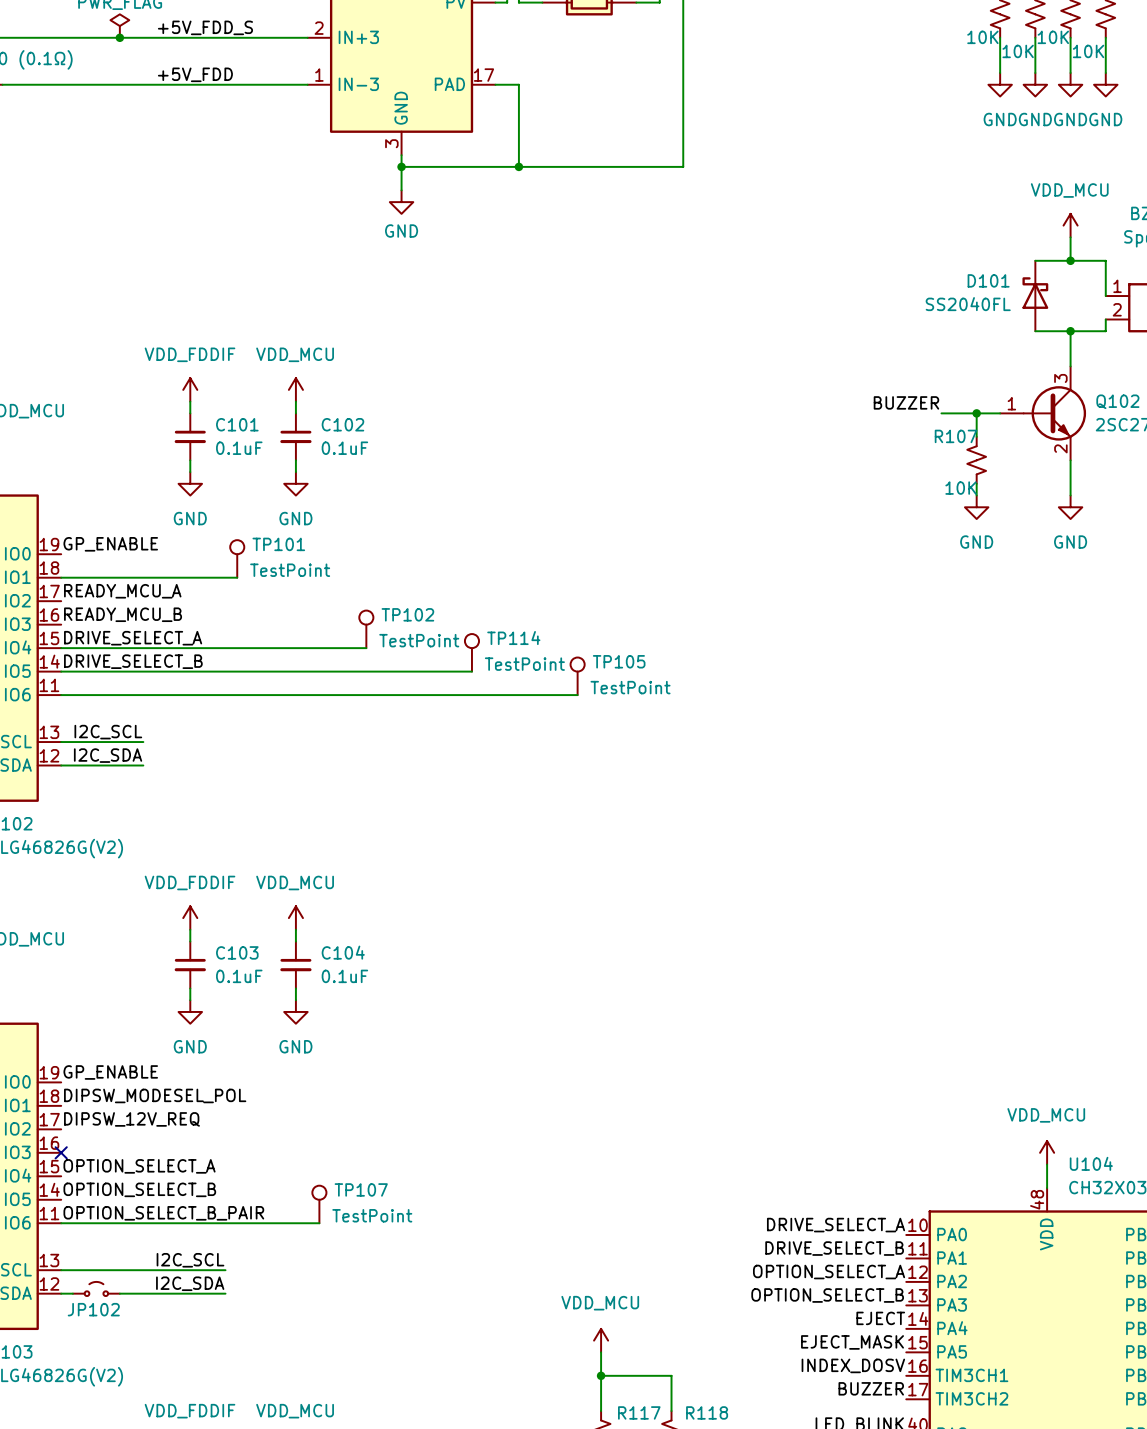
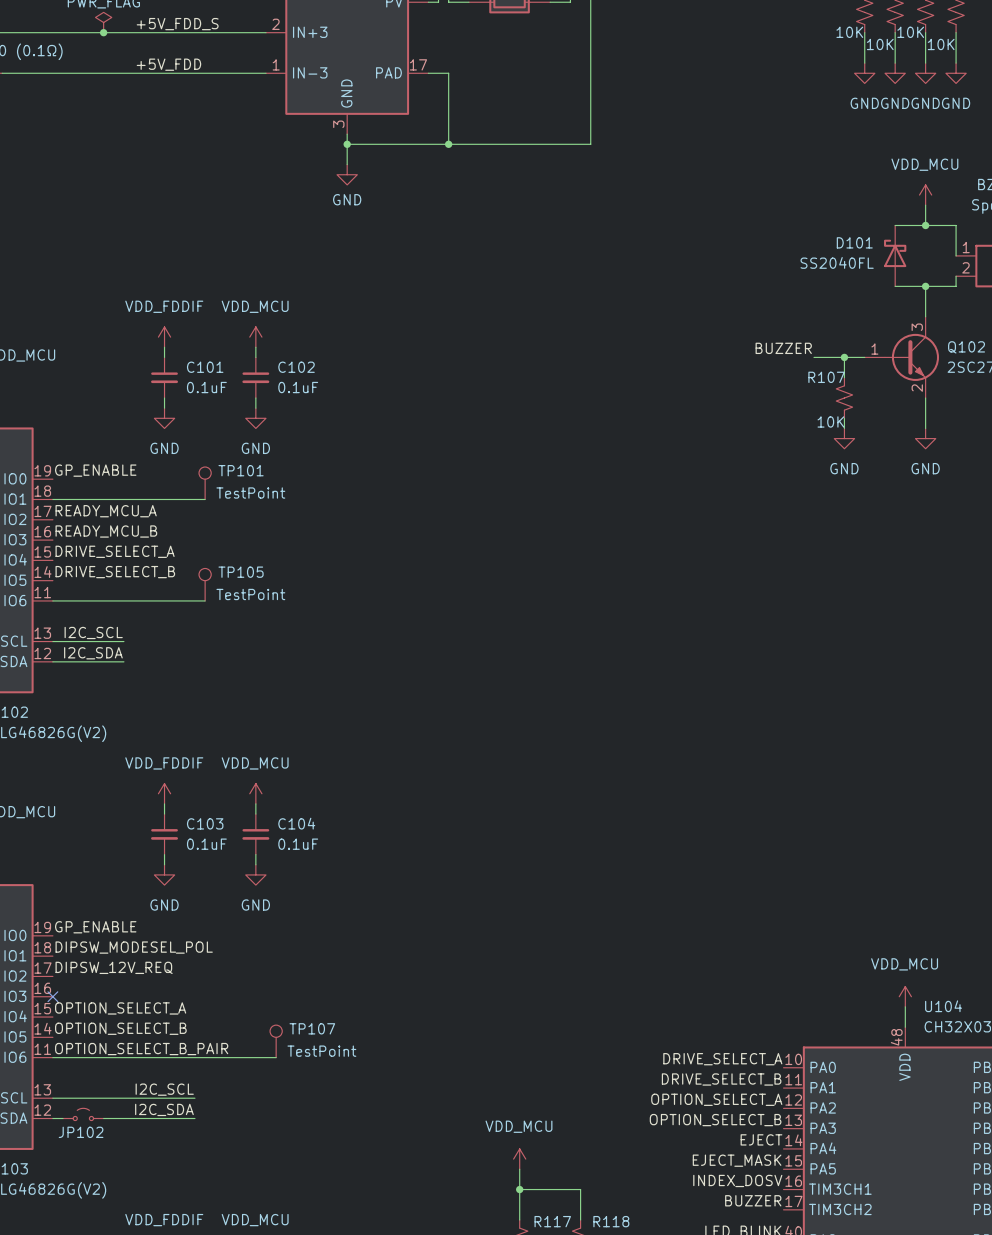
TP102: TestPoint (366, 629) -> none
wire: (61, 648) (366, 648) -> none
TP114: TestPoint (471, 652) -> none
wire: (61, 671) (471, 671) -> none
TP105 position: (577, 676) -> (205, 584)
wire: (237, 695) (577, 695) -> none

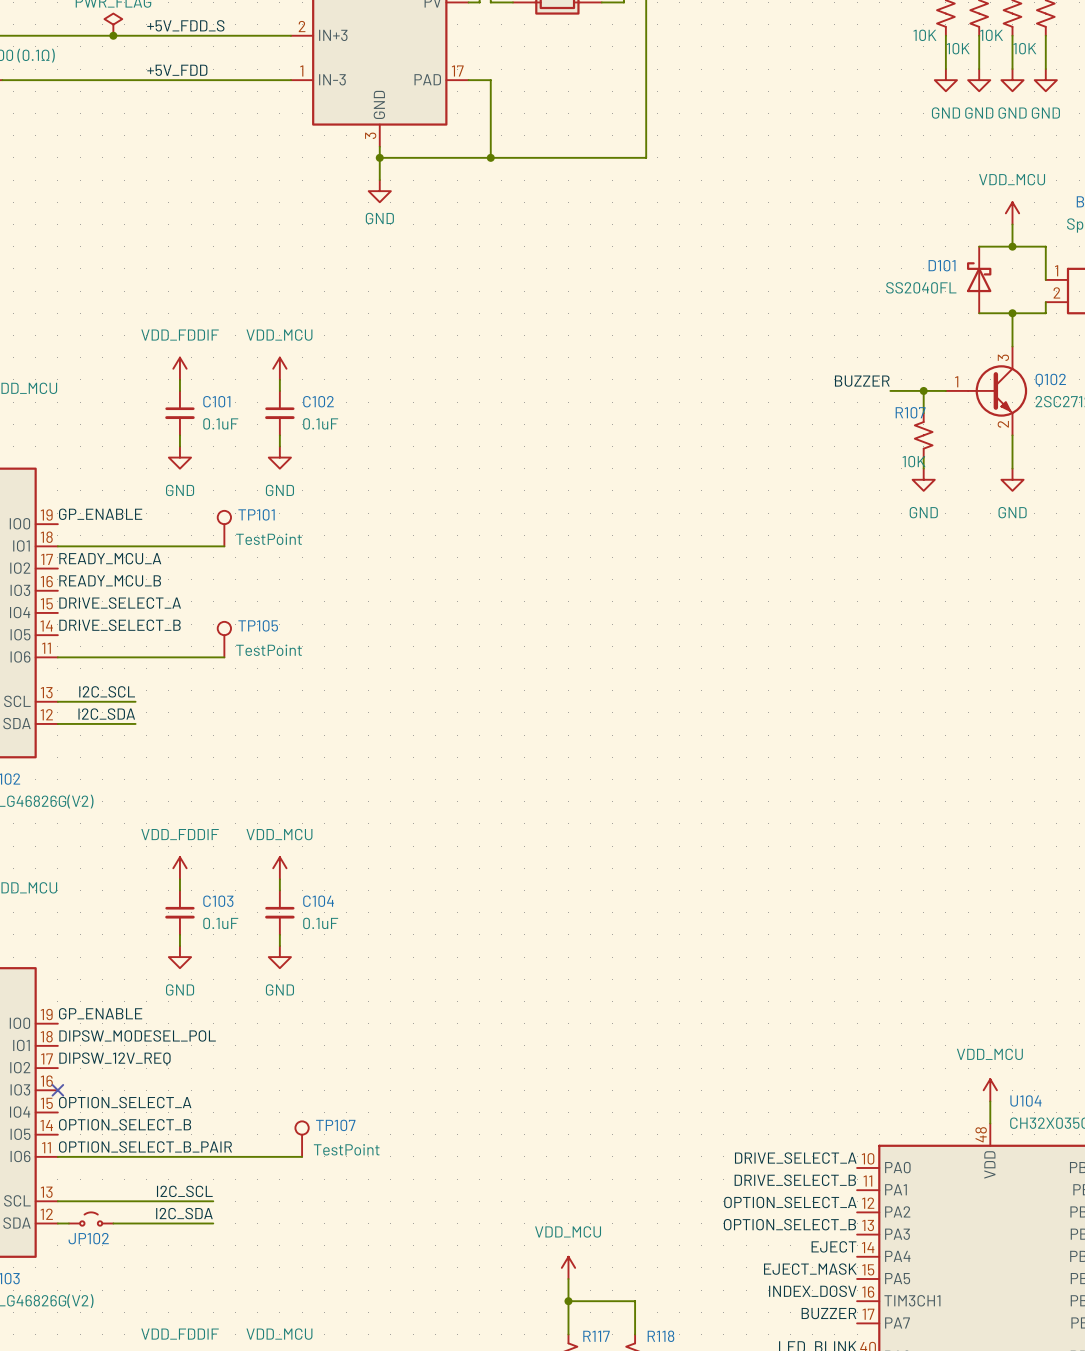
U104 pin name: TIM3CH2 (840, 1209) -> PA7 (897, 1322)

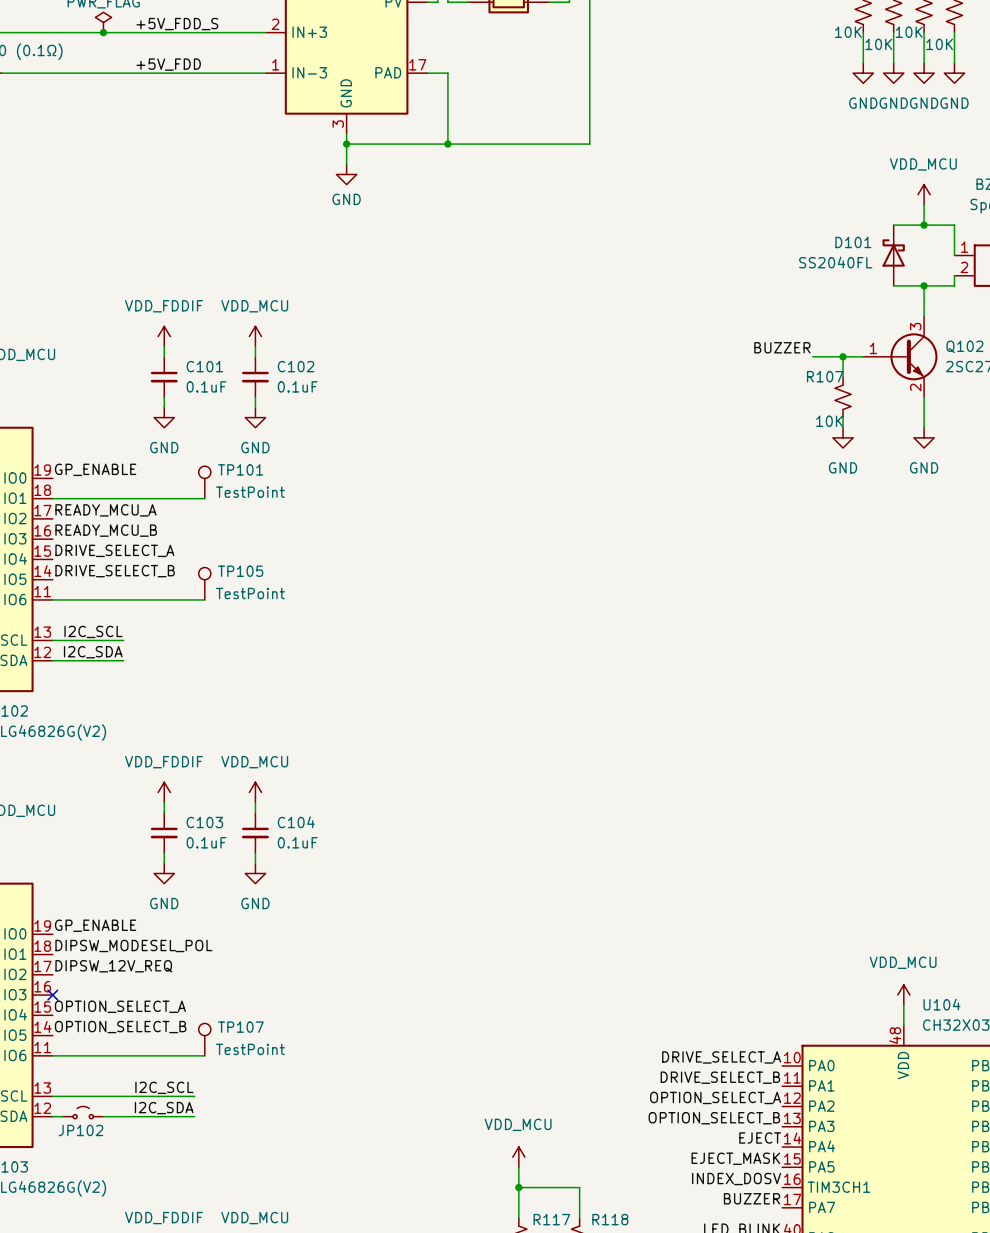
TP107 position: (302, 1139) -> (204, 1039)
label: OPTION_SELECT_B_PAIR (145, 1146) -> none
wire: (224, 1156) (302, 1156) -> none

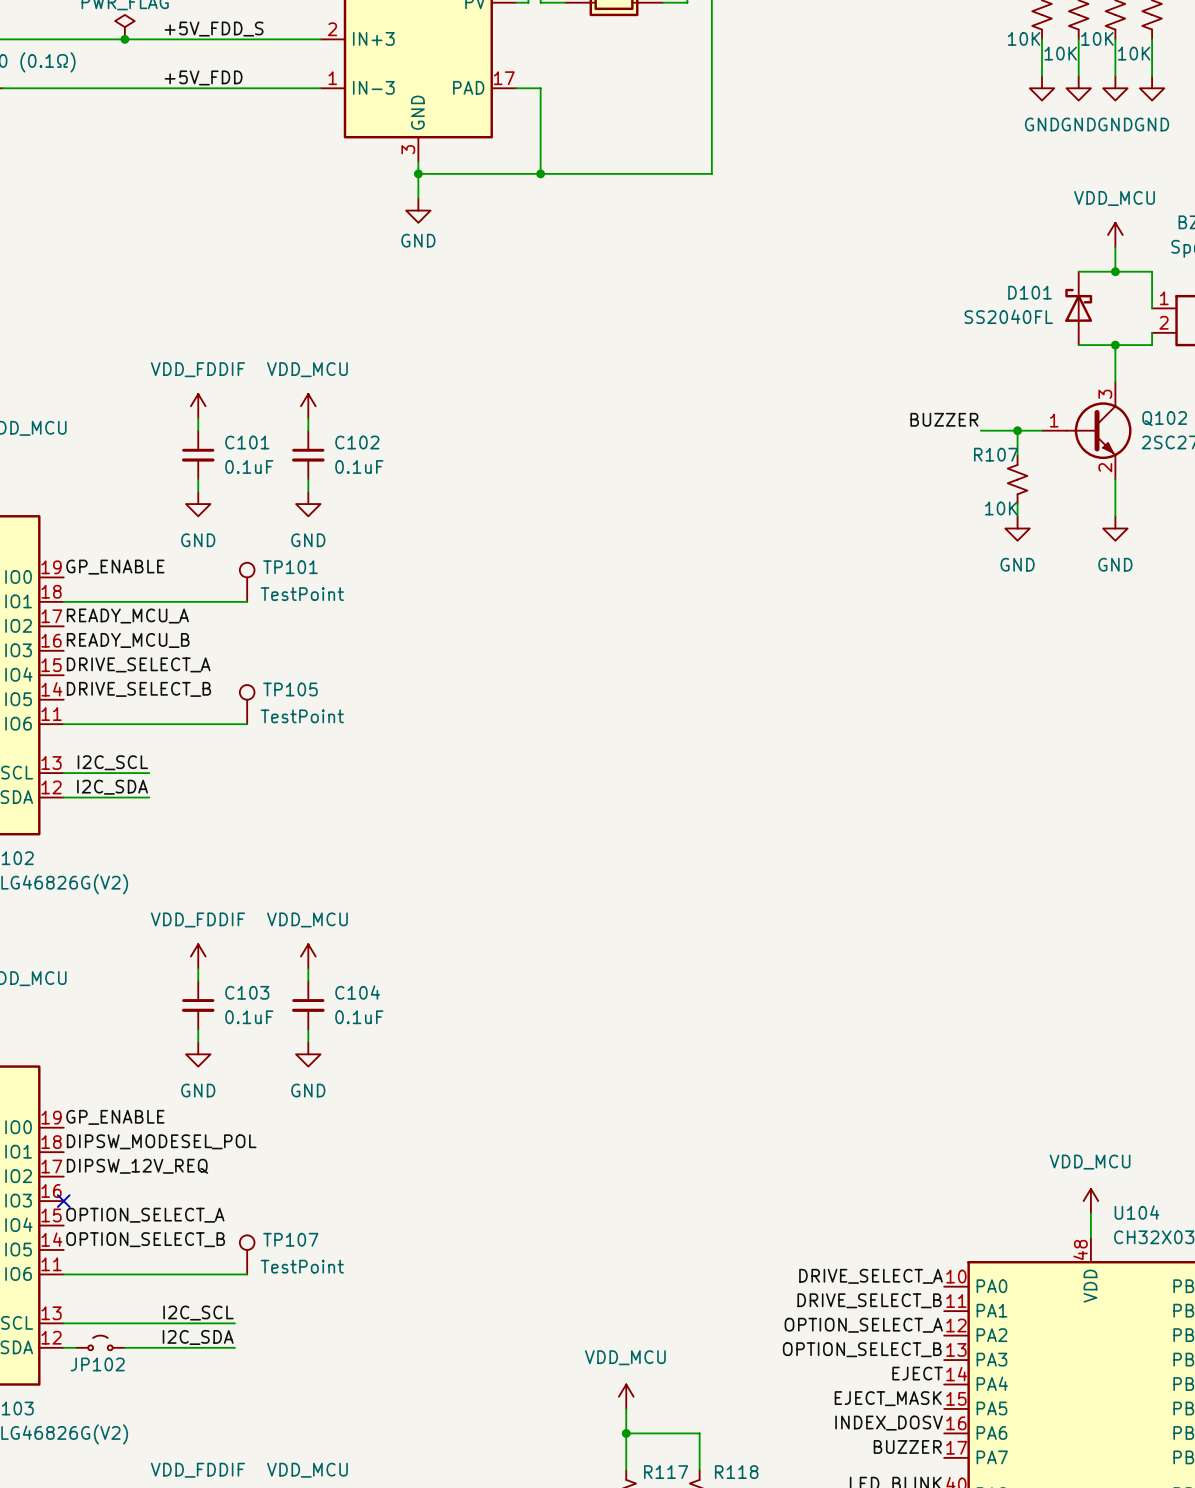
U104 pin name: TIM3CH1 (838, 1187) -> PA6 (991, 1432)

